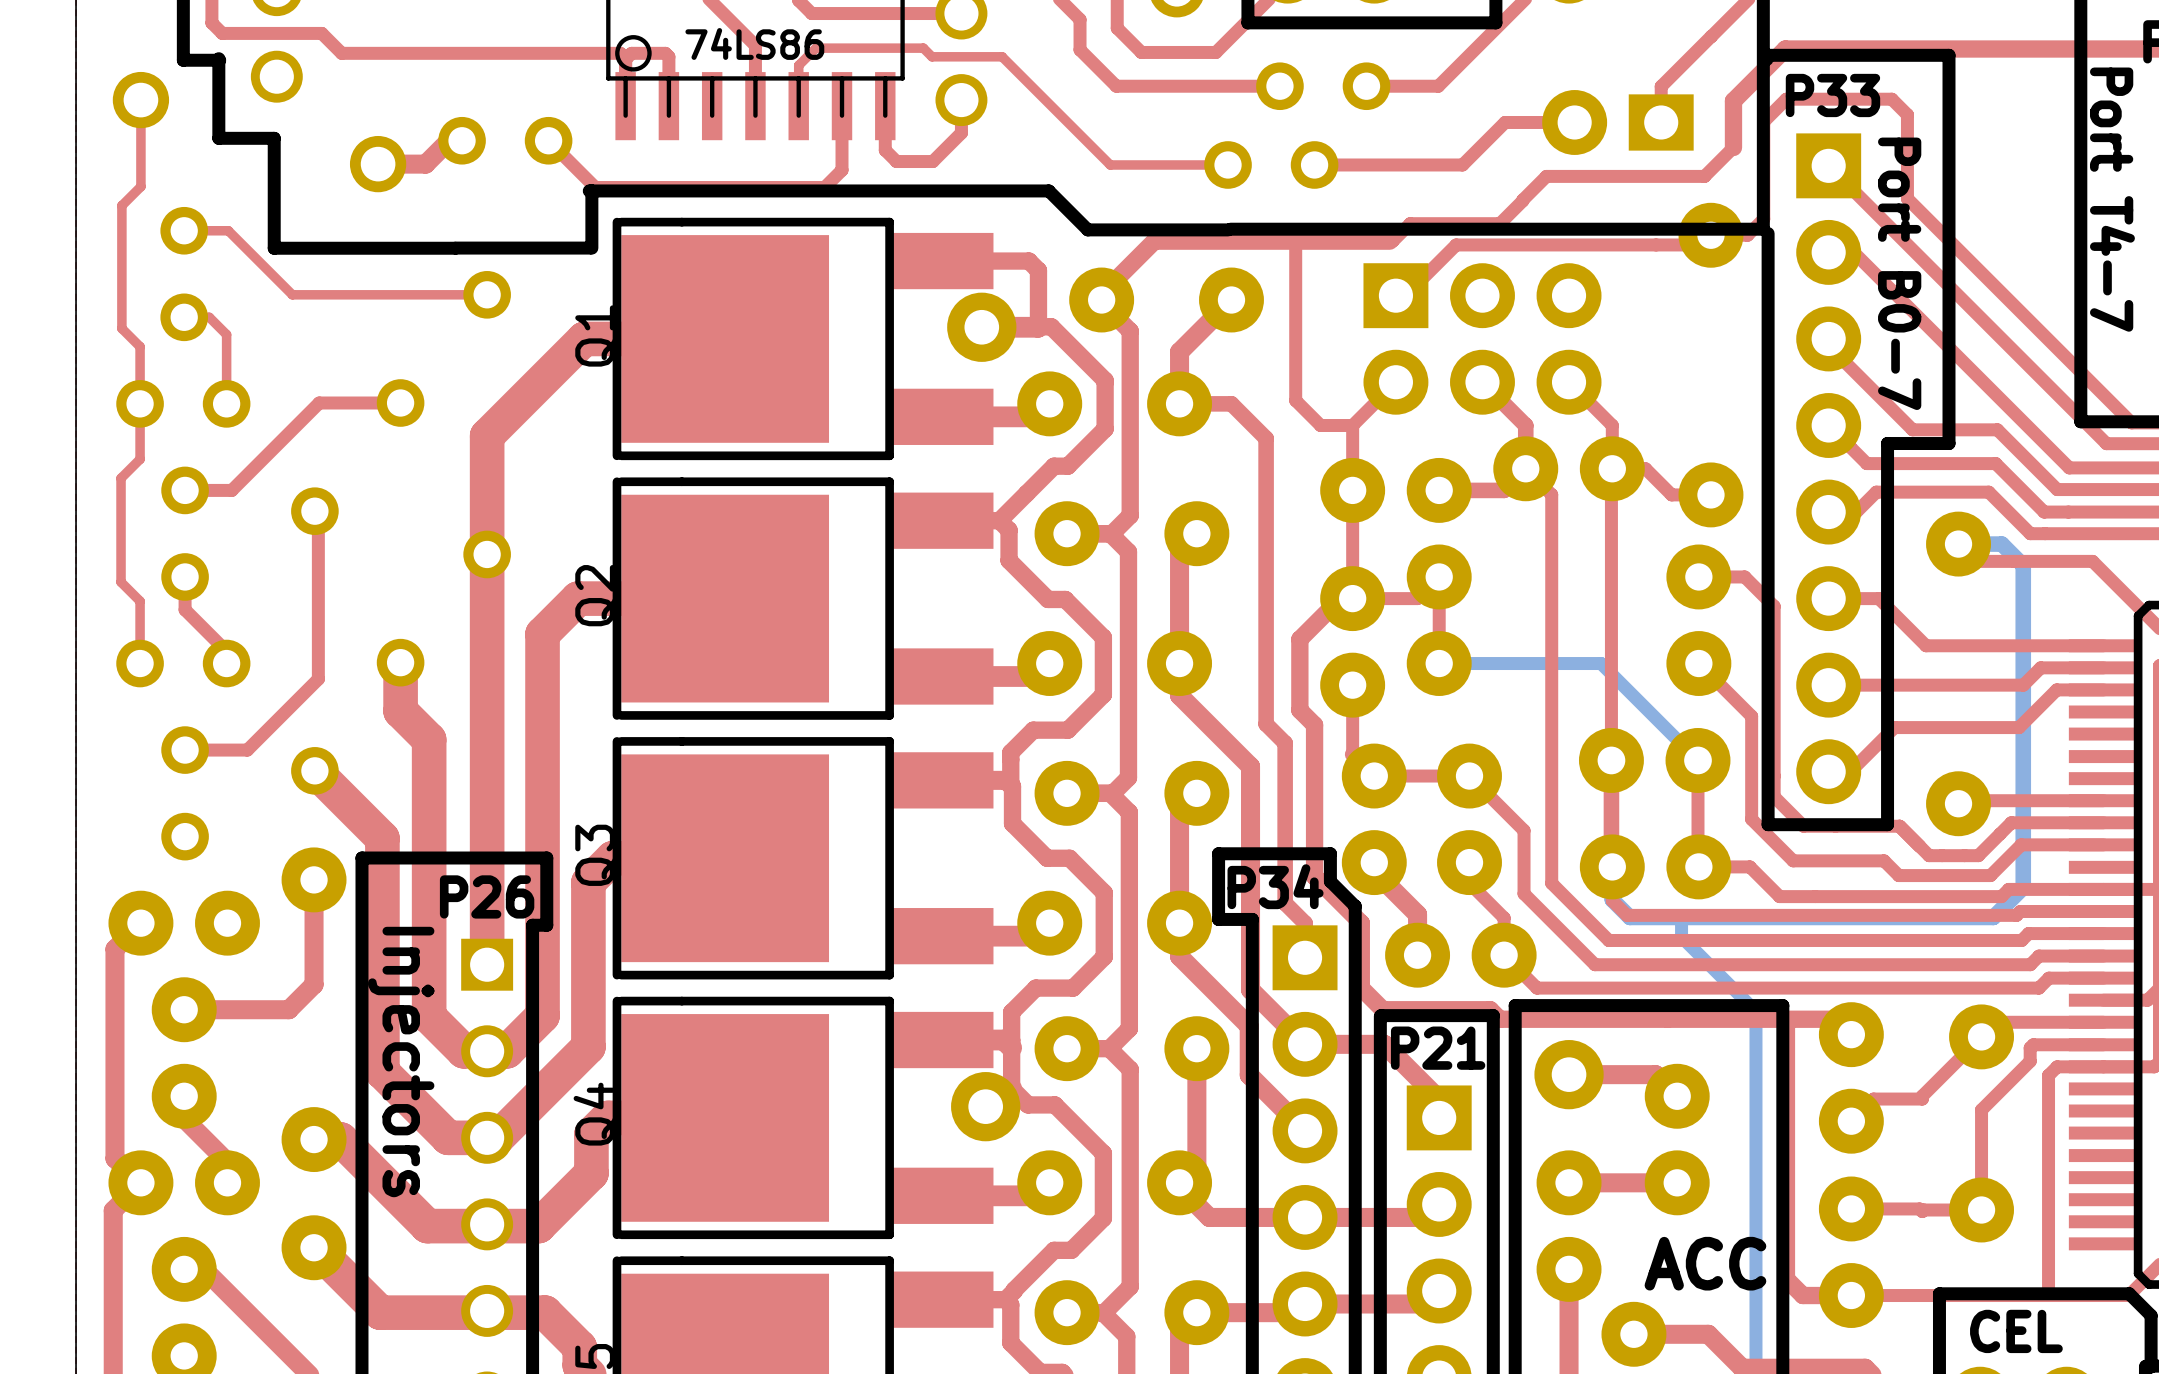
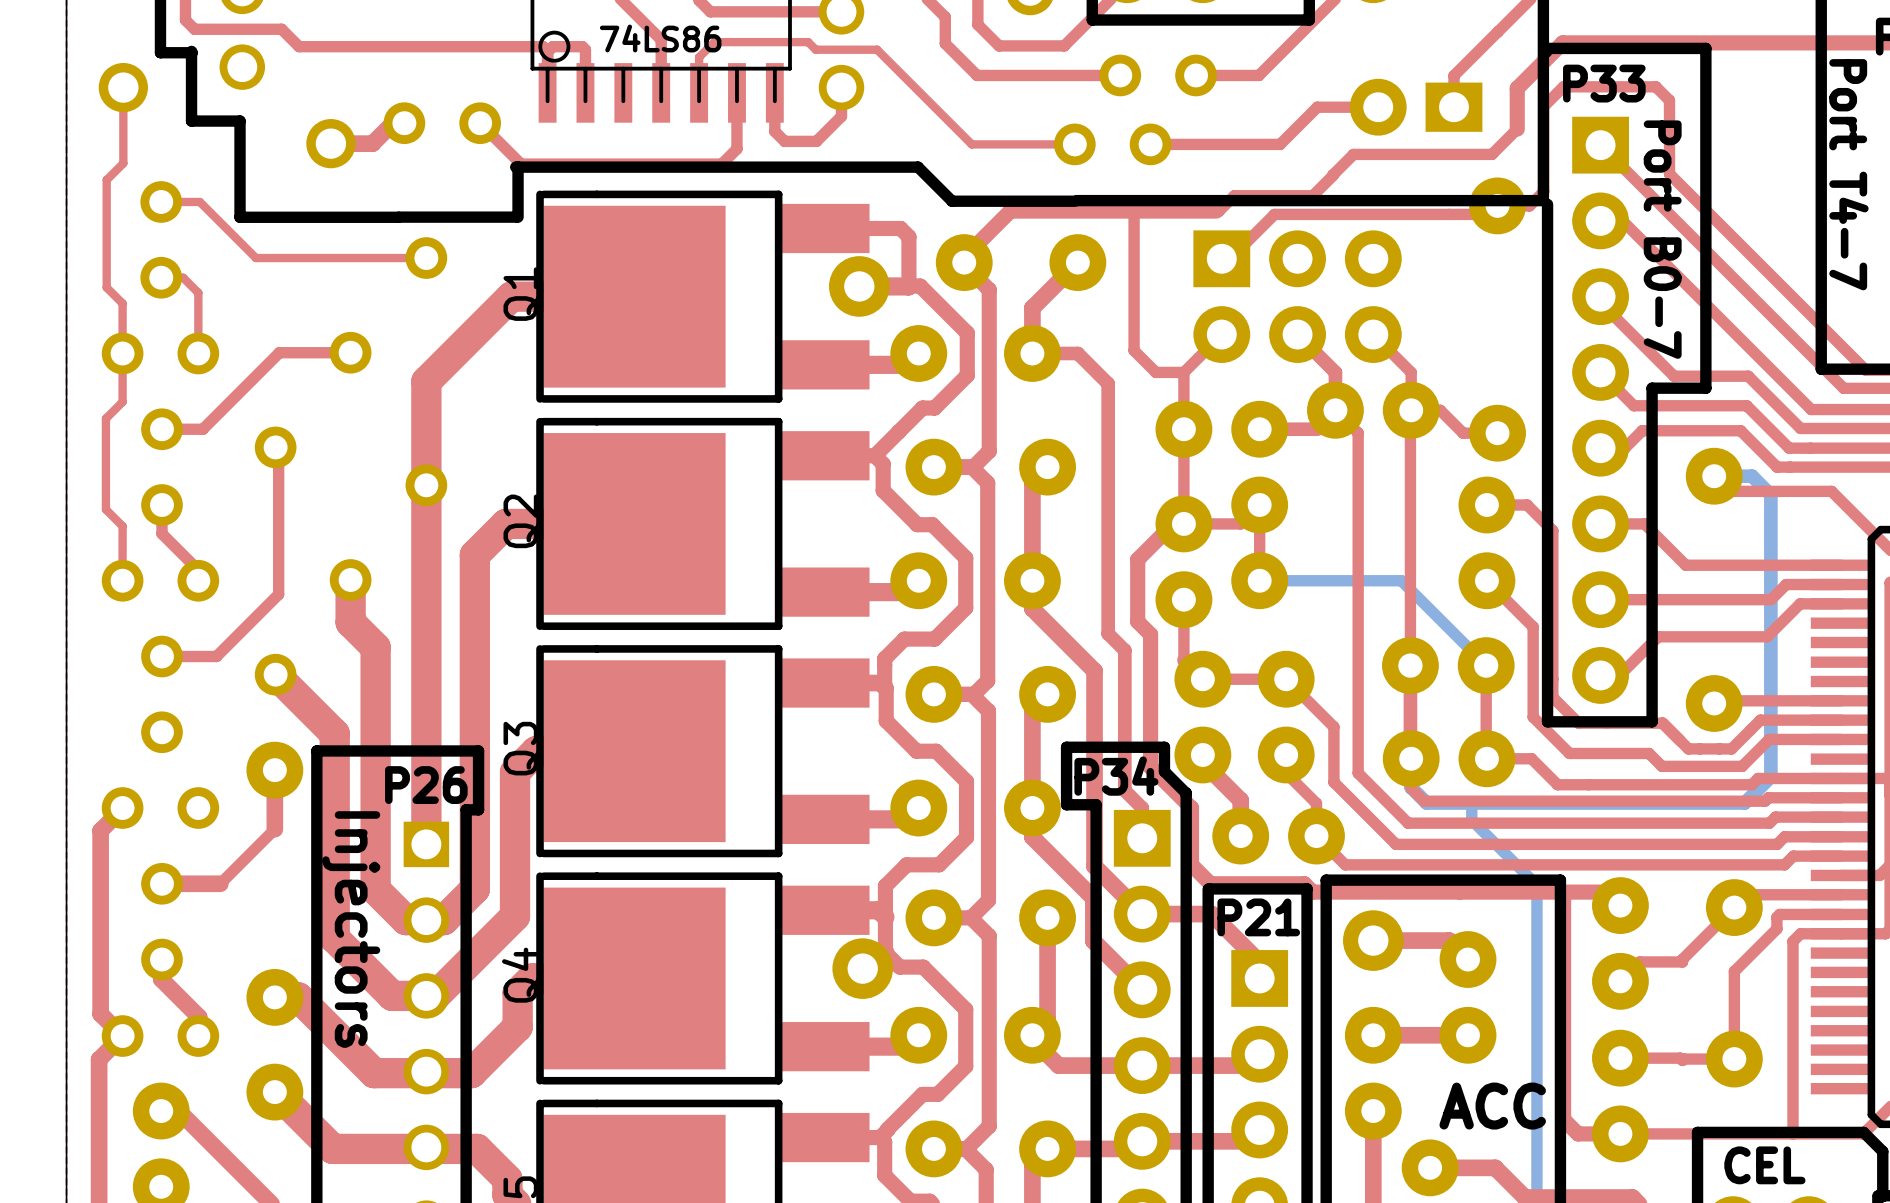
part footprint: [108, 890, 260, 956] -> [101, 787, 220, 829]
top track: (314, 947) (314, 984) (288, 1009) (251, 1009) -> (274, 829) (220, 883)
part footprint: [151, 977, 217, 1129] -> [141, 862, 183, 981]
part footprint: [108, 1150, 260, 1216] -> [101, 1015, 220, 1057]

